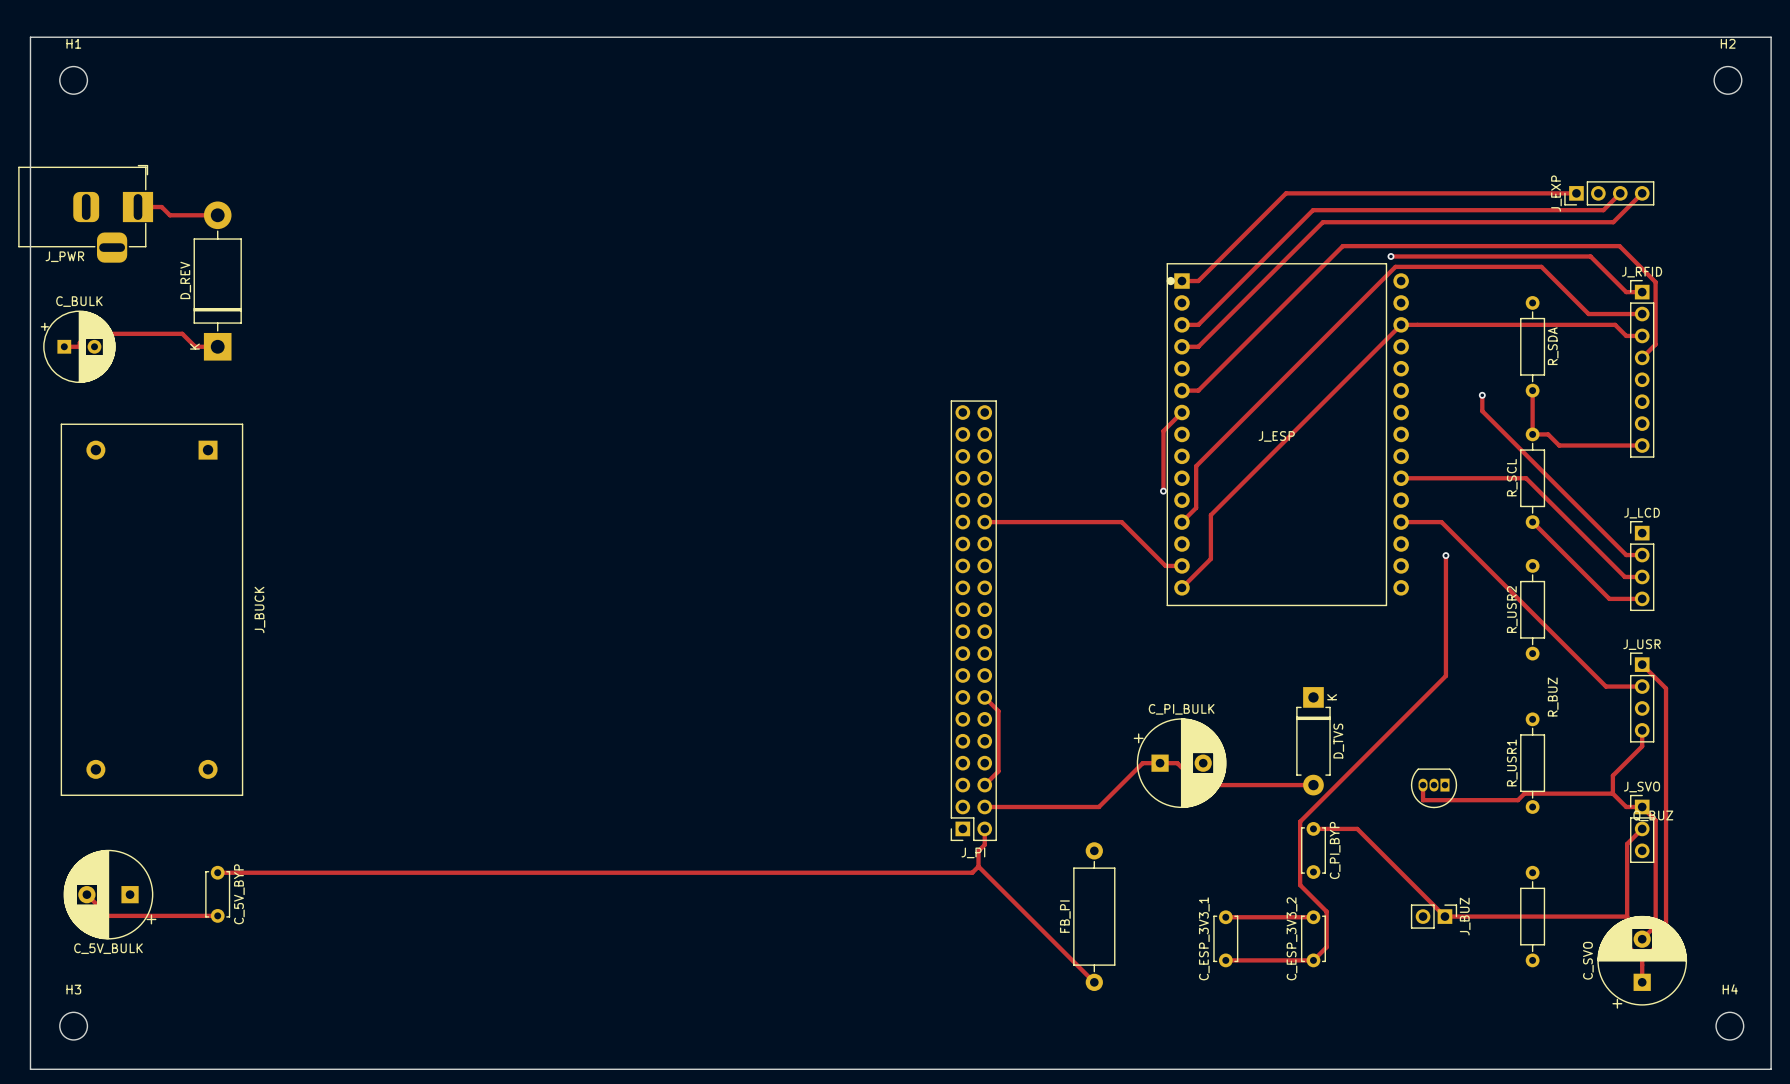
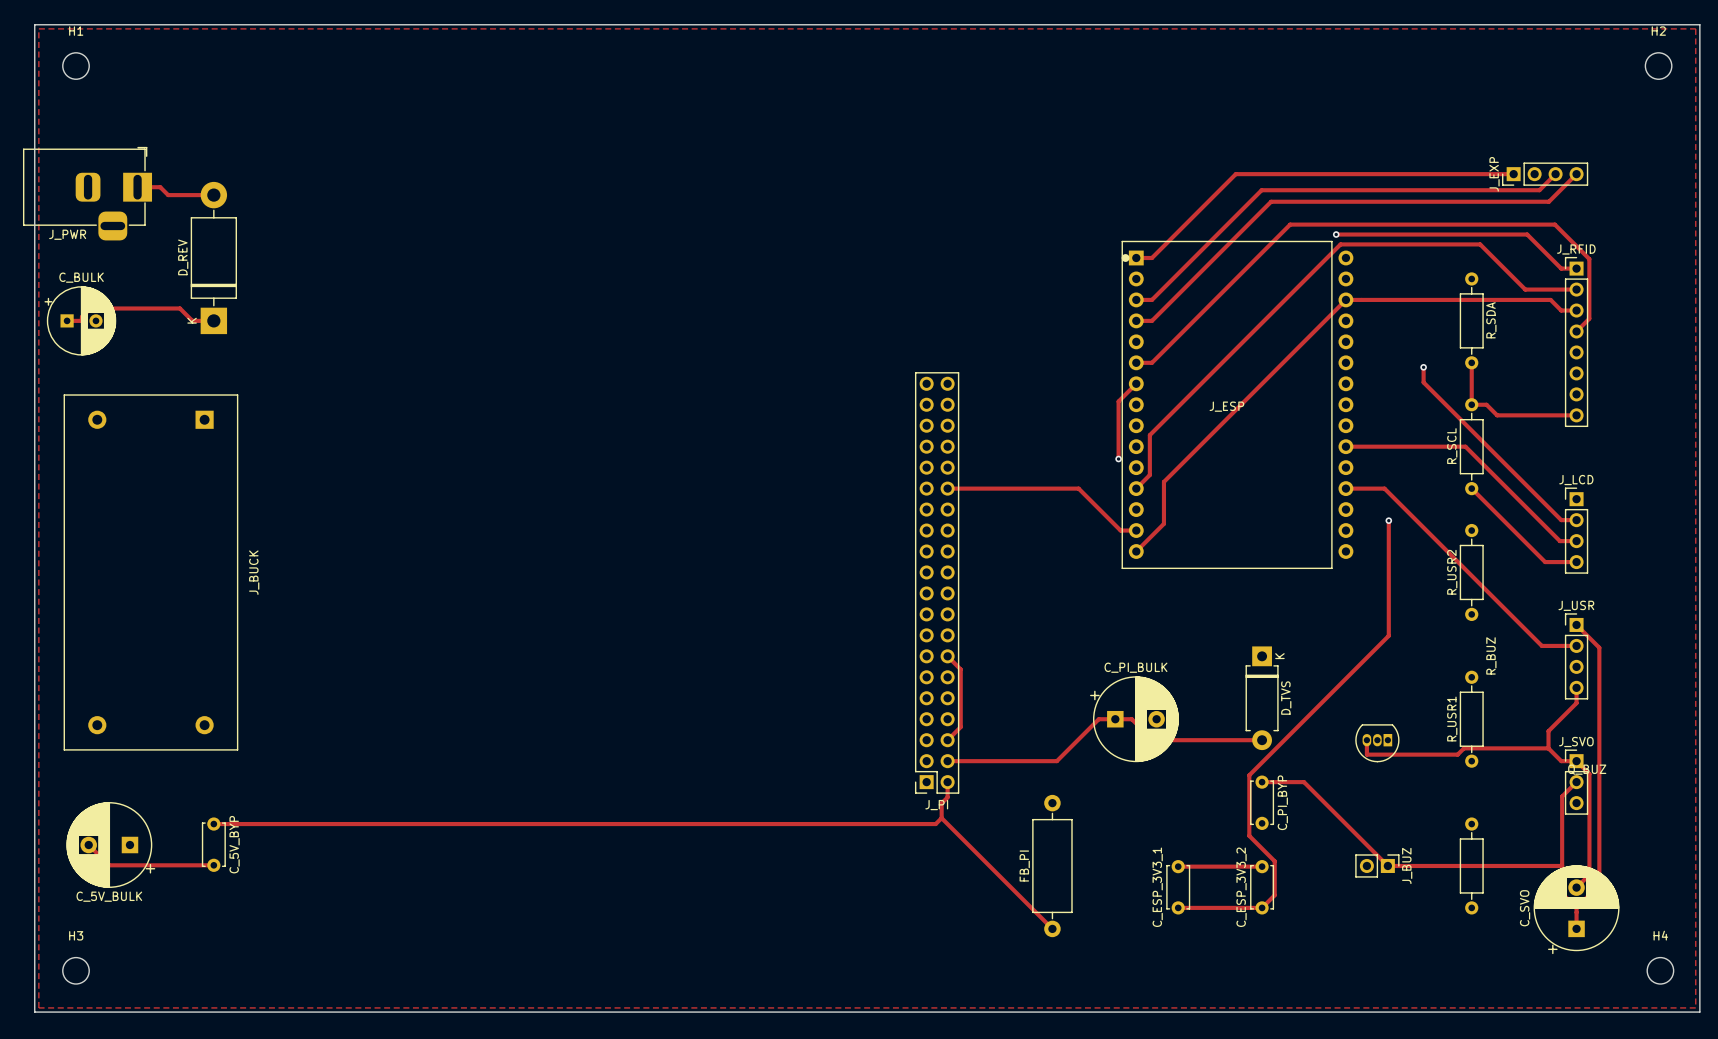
zone outline: none -> (38, 28) (1695, 28) (1695, 1007) (38, 1007) (38, 28)

